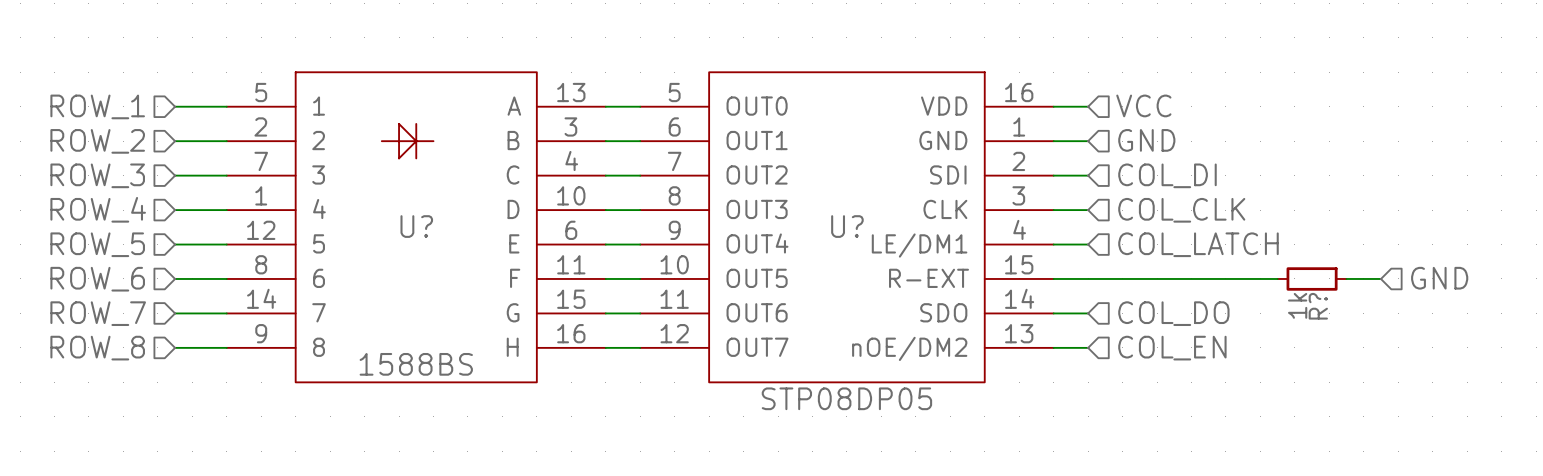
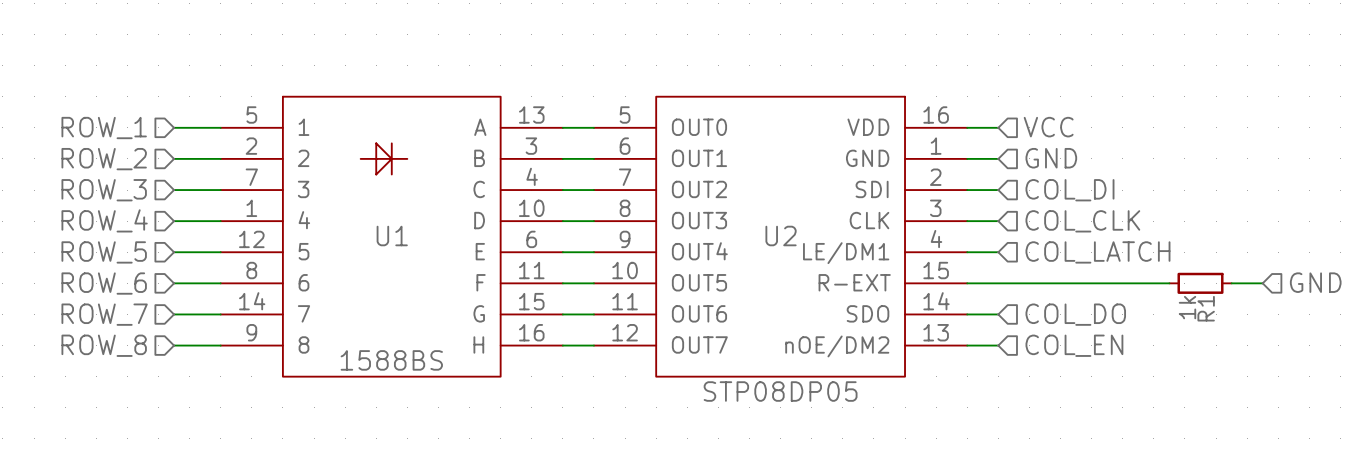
U? name: U? (416, 226) -> U1 (392, 235)
U? name: U? (847, 226) -> U2 (781, 235)
R? name: R? (1318, 306) -> R1 (1206, 308)

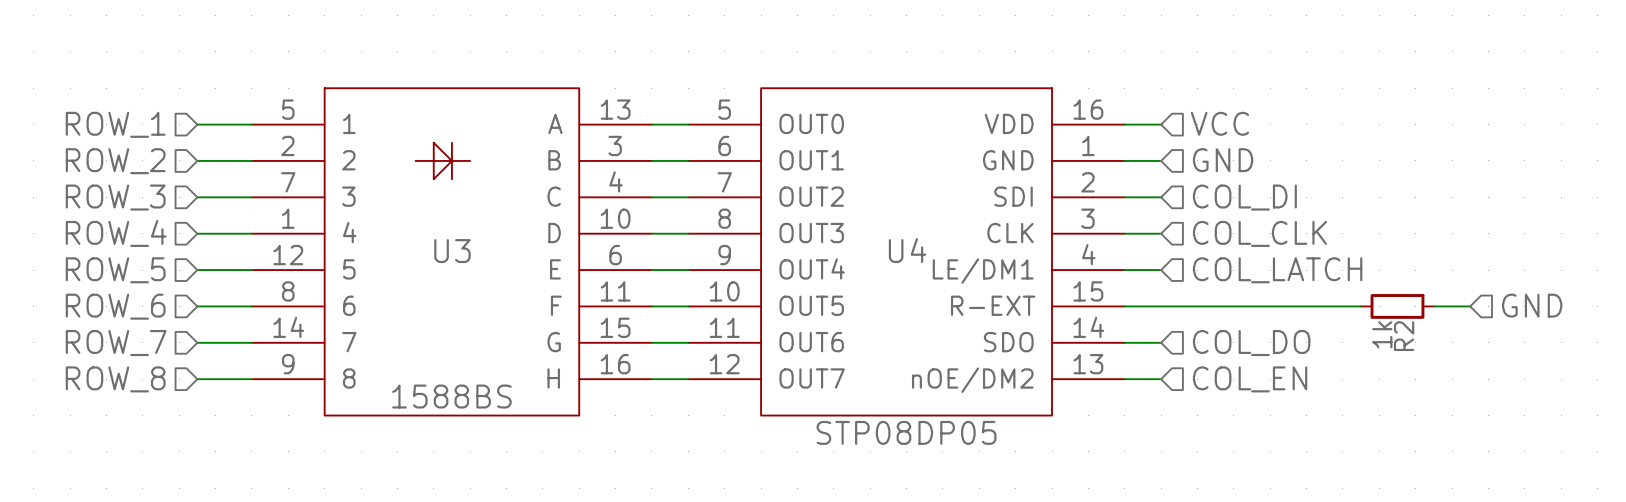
U1 name: U1 (392, 235) -> U3 (452, 251)
U2 name: U2 (781, 235) -> U4 (907, 250)
R1 name: R1 (1206, 308) -> R2 (1404, 336)

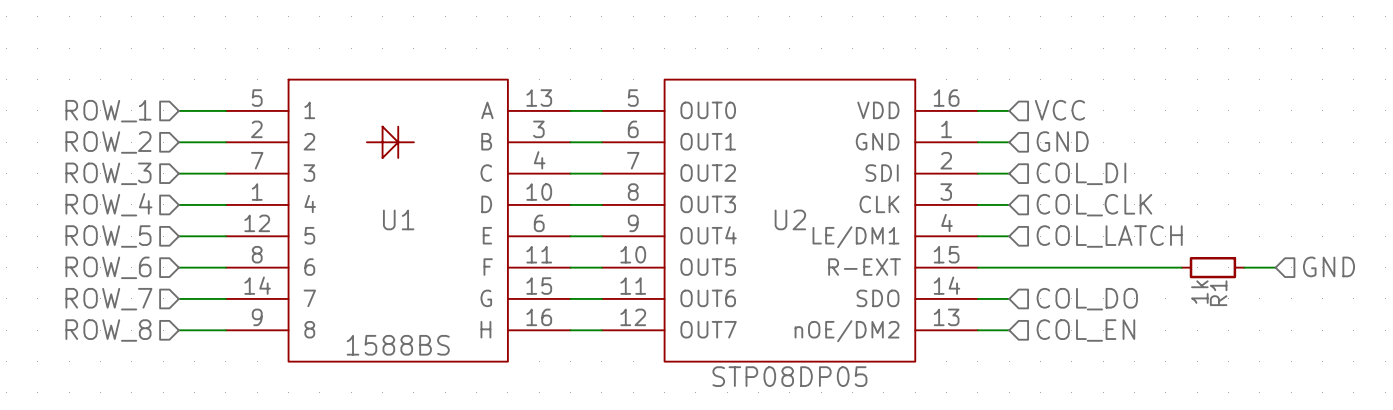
U4 name: U4 (907, 250) -> U2 (790, 219)
U3 name: U3 (452, 251) -> U1 (398, 219)
R2 name: R2 (1404, 336) -> R1 (1218, 293)

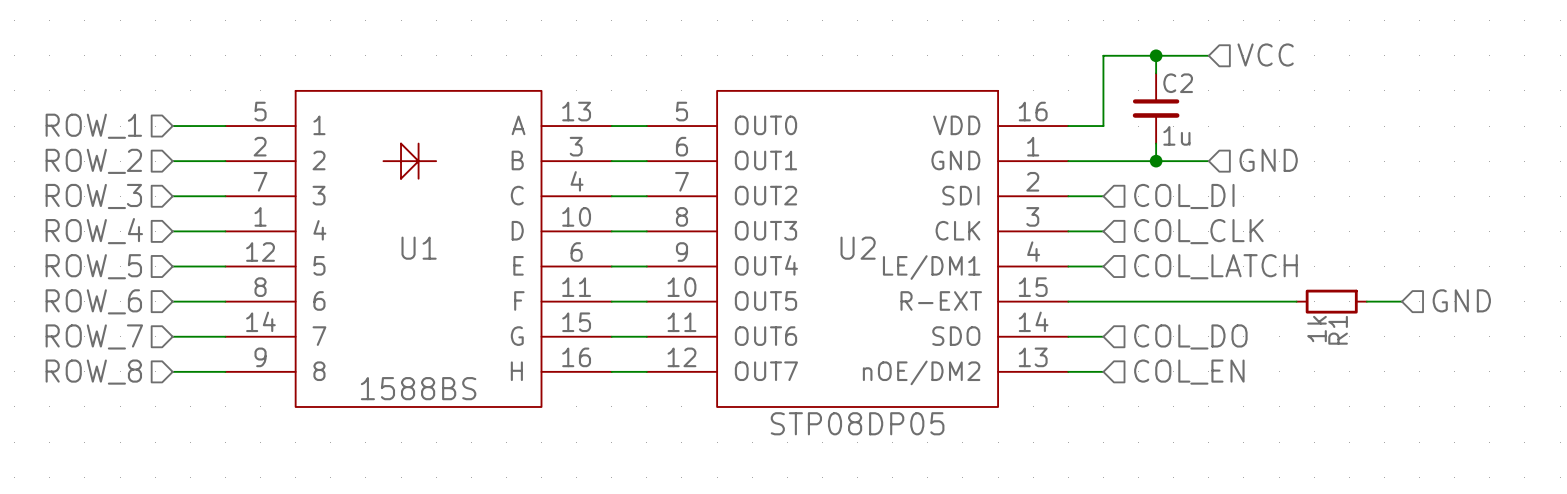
wire: none -> (1156, 55) (1156, 73)
junction: none -> (1156, 55)
wire: none -> (1208, 55) (1103, 55) (1103, 126)
C2: none -> 1u (1156, 108)
hierarchical label position: VCC (1059, 110) -> VCC (1265, 54)
wire: none -> (1156, 143) (1156, 161)
hierarchical label position: GND (1062, 141) -> GND (1268, 160)
wire: none -> (1103, 161) (1208, 161)
junction: none -> (1156, 161)

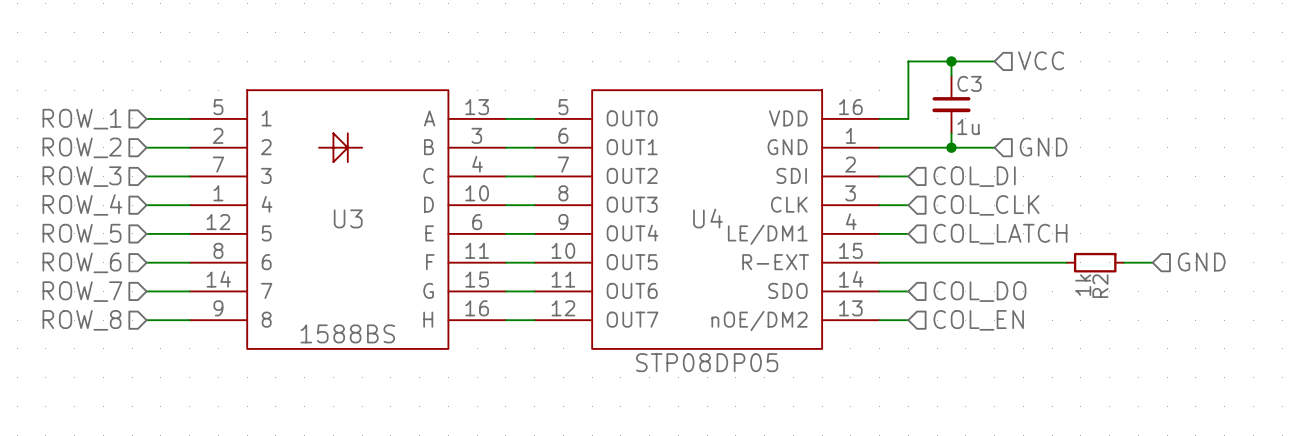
C2 name: C2 (1178, 83) -> C3 (969, 83)
U1 name: U1 (419, 248) -> U3 (348, 218)
U2 name: U2 (858, 248) -> U4 (707, 218)
R1 name: R1 (1338, 330) -> R2 (1100, 286)

